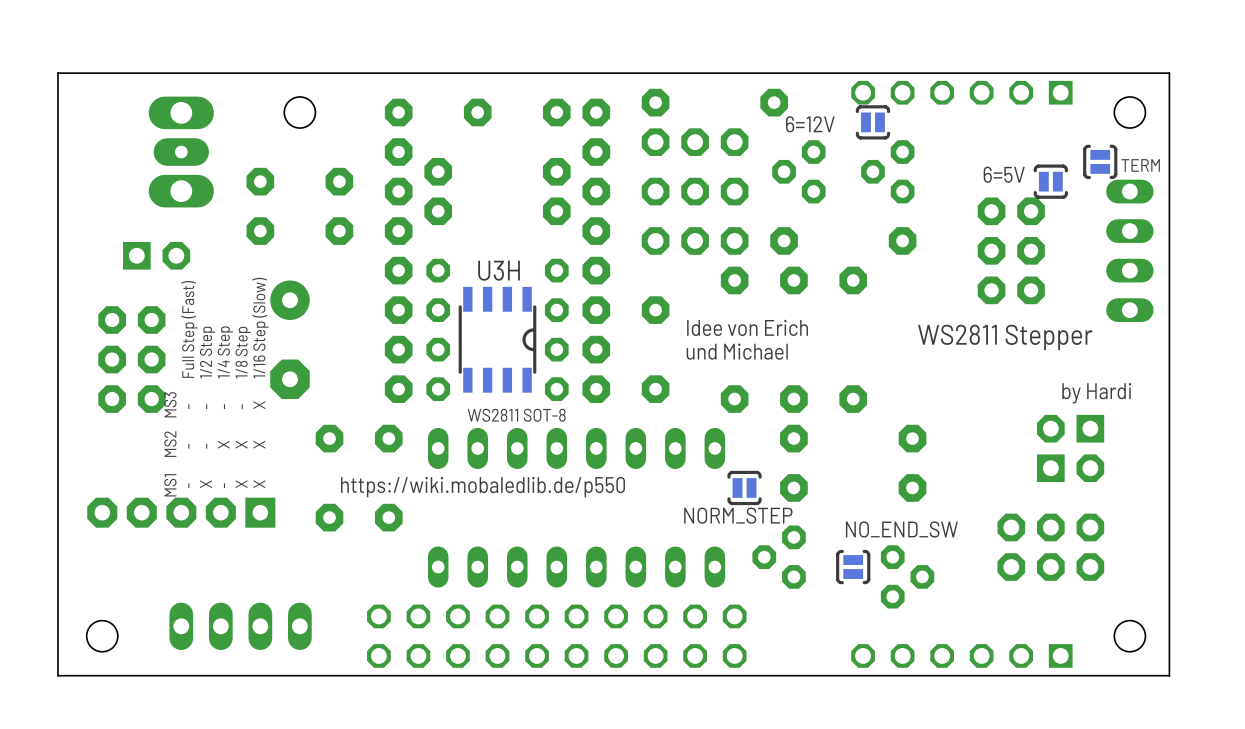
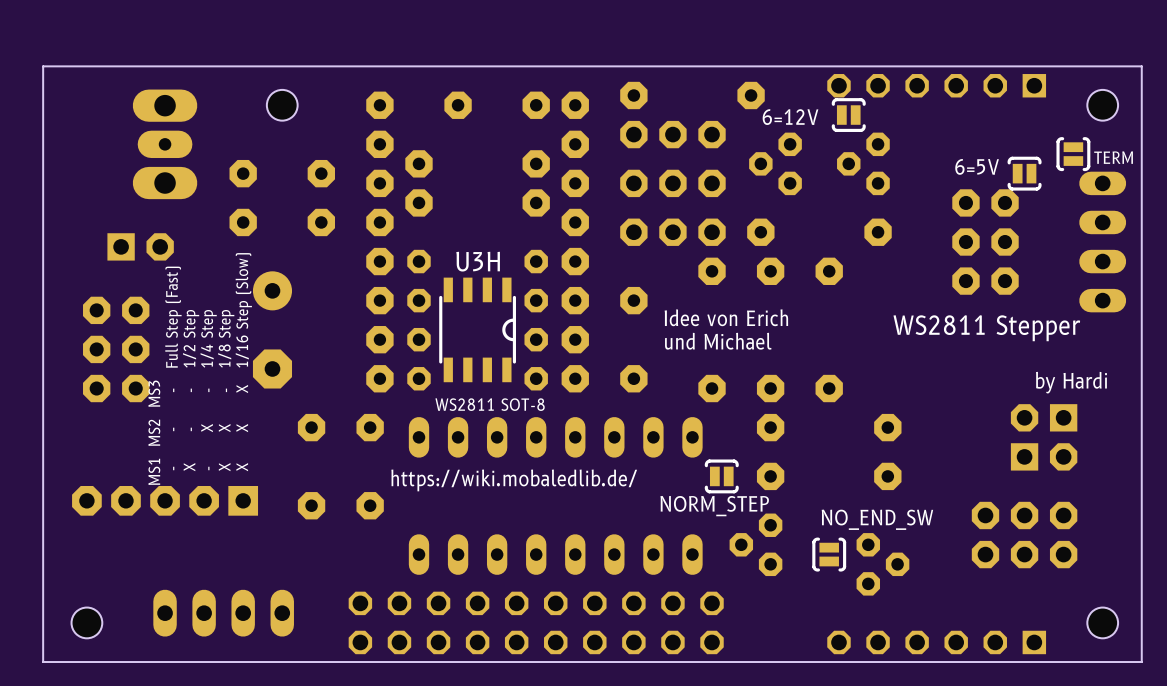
text: https://wiki.mobaledlib.de/p550 (483, 487) -> https://wiki.mobaledlib.de/ (514, 480)

